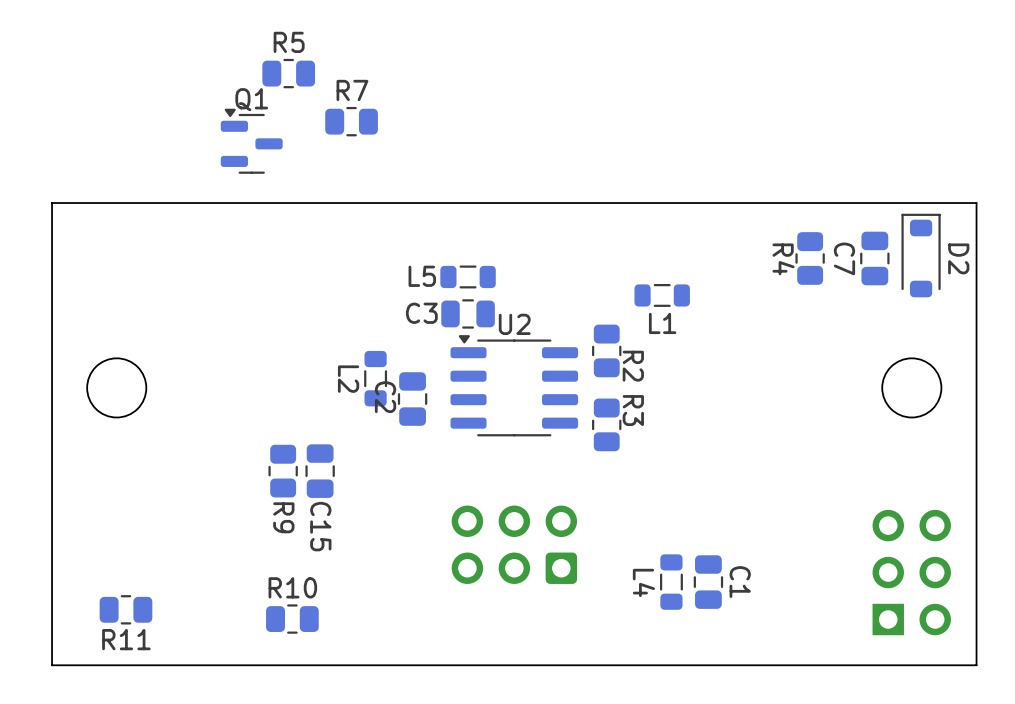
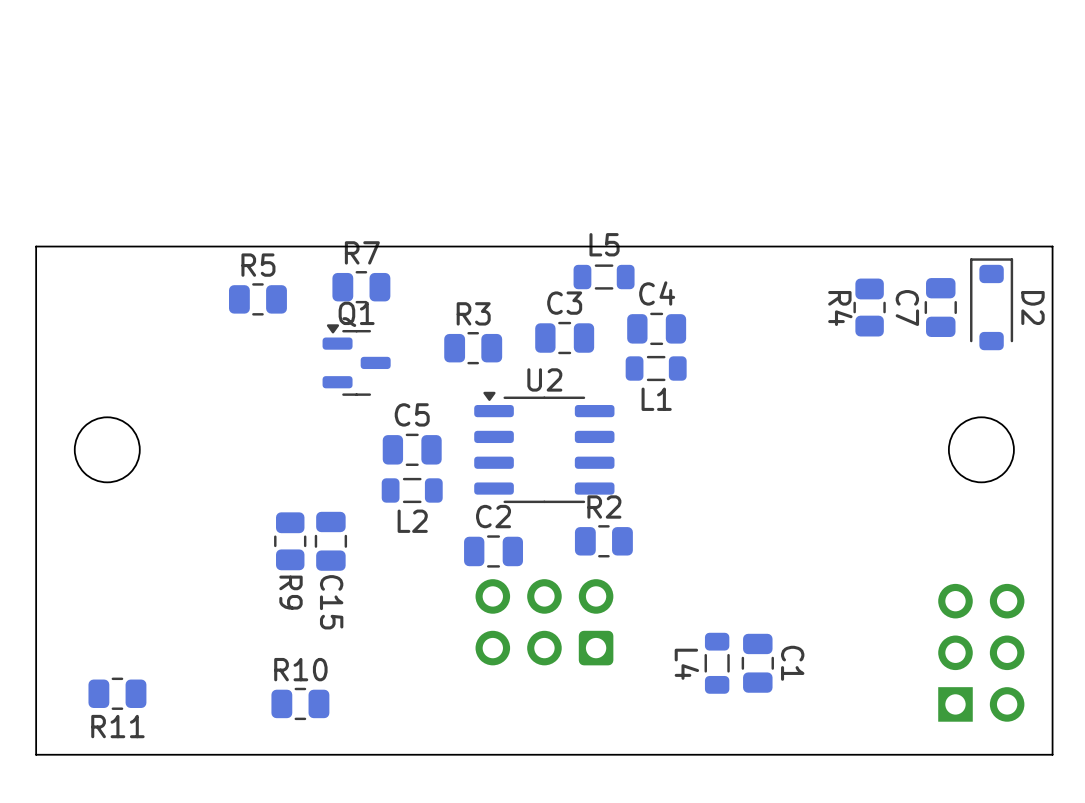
R5 position: (288, 73) -> (257, 299)
R7 position: (351, 121) -> (361, 287)
Q1 position: (251, 141) -> (356, 360)
L5 name position: L5 (422, 276) -> L5 (604, 244)
L5 position: (468, 276) -> (604, 277)
C4: none -> (656, 328)
L1 position: (662, 295) -> (656, 368)
C3 name position: C3 (421, 313) -> C3 (564, 303)
C3 position: (468, 313) -> (564, 338)
R2 rotation: 0° (606, 350) -> 90° clockwise (603, 541)
R2 position: (606, 350) -> (603, 541)
R2 name position: R2 (633, 366) -> R2 (604, 507)
L2 rotation: 0° (375, 378) -> 90° clockwise (412, 490)
L2 position: (375, 378) -> (412, 490)
L2 name position: L2 (348, 379) -> L2 (412, 521)
C5: none -> (412, 449)
C2 rotation: 0° (412, 399) -> 90° clockwise (493, 551)
C2 position: (412, 399) -> (493, 551)
R3 rotation: 0° (606, 424) -> 90° clockwise (473, 348)
R3 position: (606, 424) -> (473, 348)

